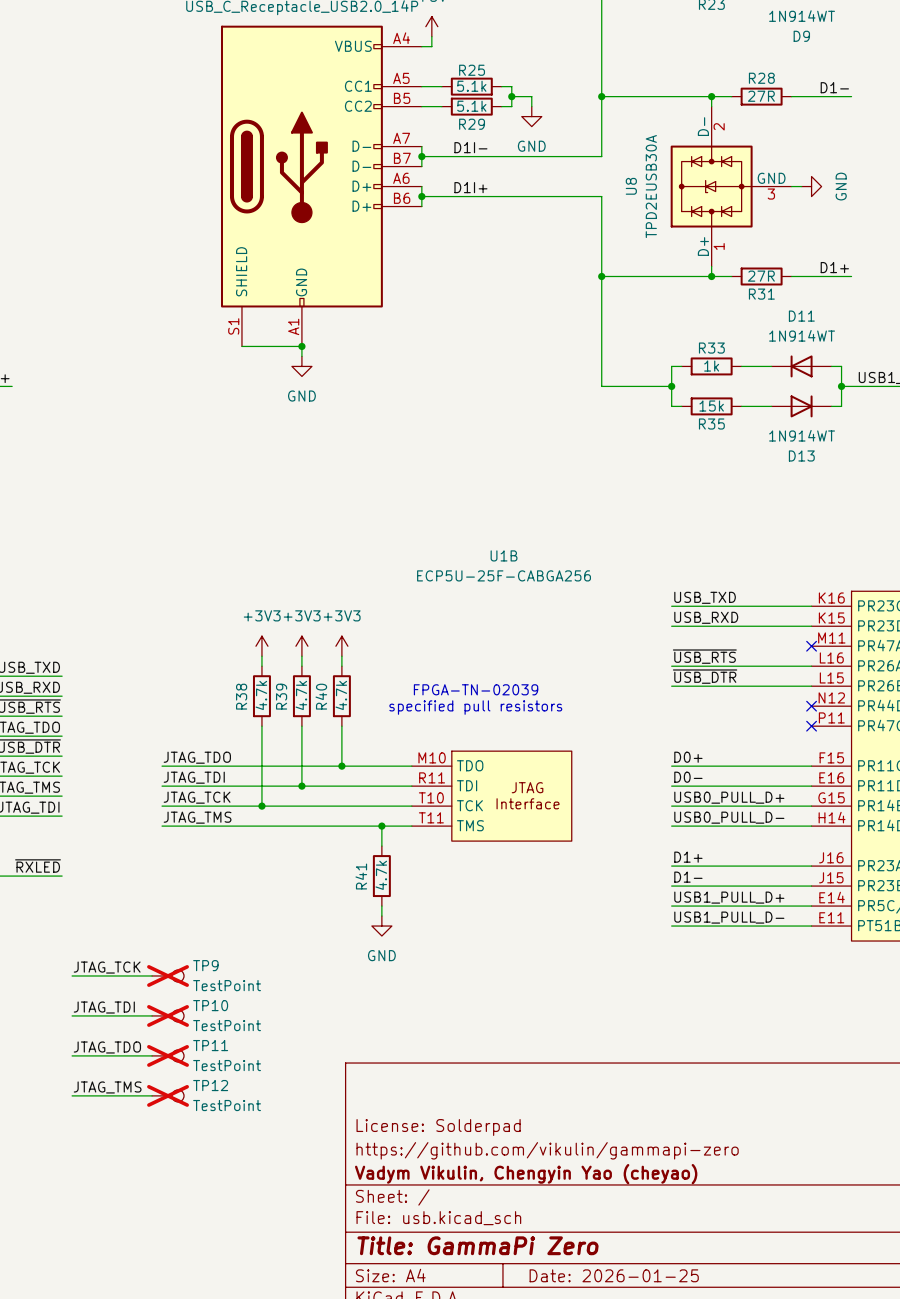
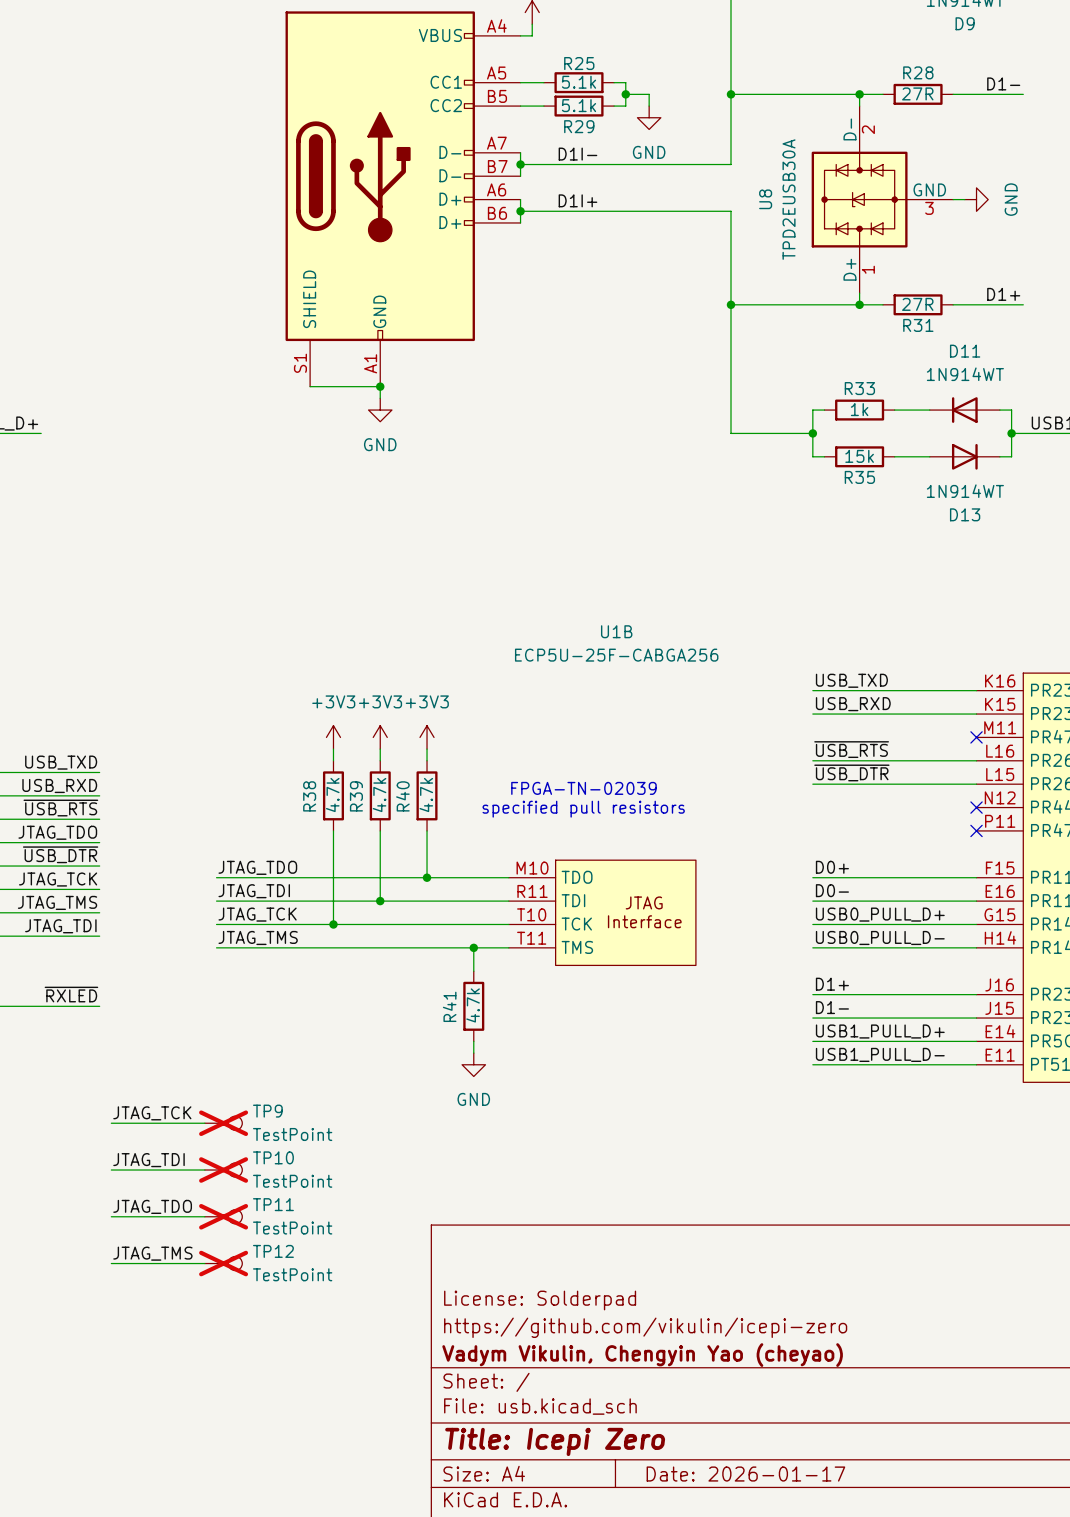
title block: https://github.com/vikulin/gammapi-zero (547, 1150) -> https://github.com/vikulin/icepi-zero (645, 1327)
title block: Title: GammaPi Zero (478, 1245) -> Title: Icepi Zero (555, 1441)
title block: Date: 2026-01-25 (614, 1275) -> Date: 2026-01-17 (745, 1474)

